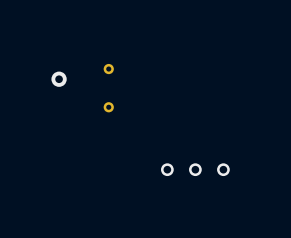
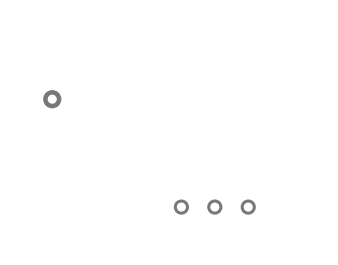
part: (108, 88) -> none

